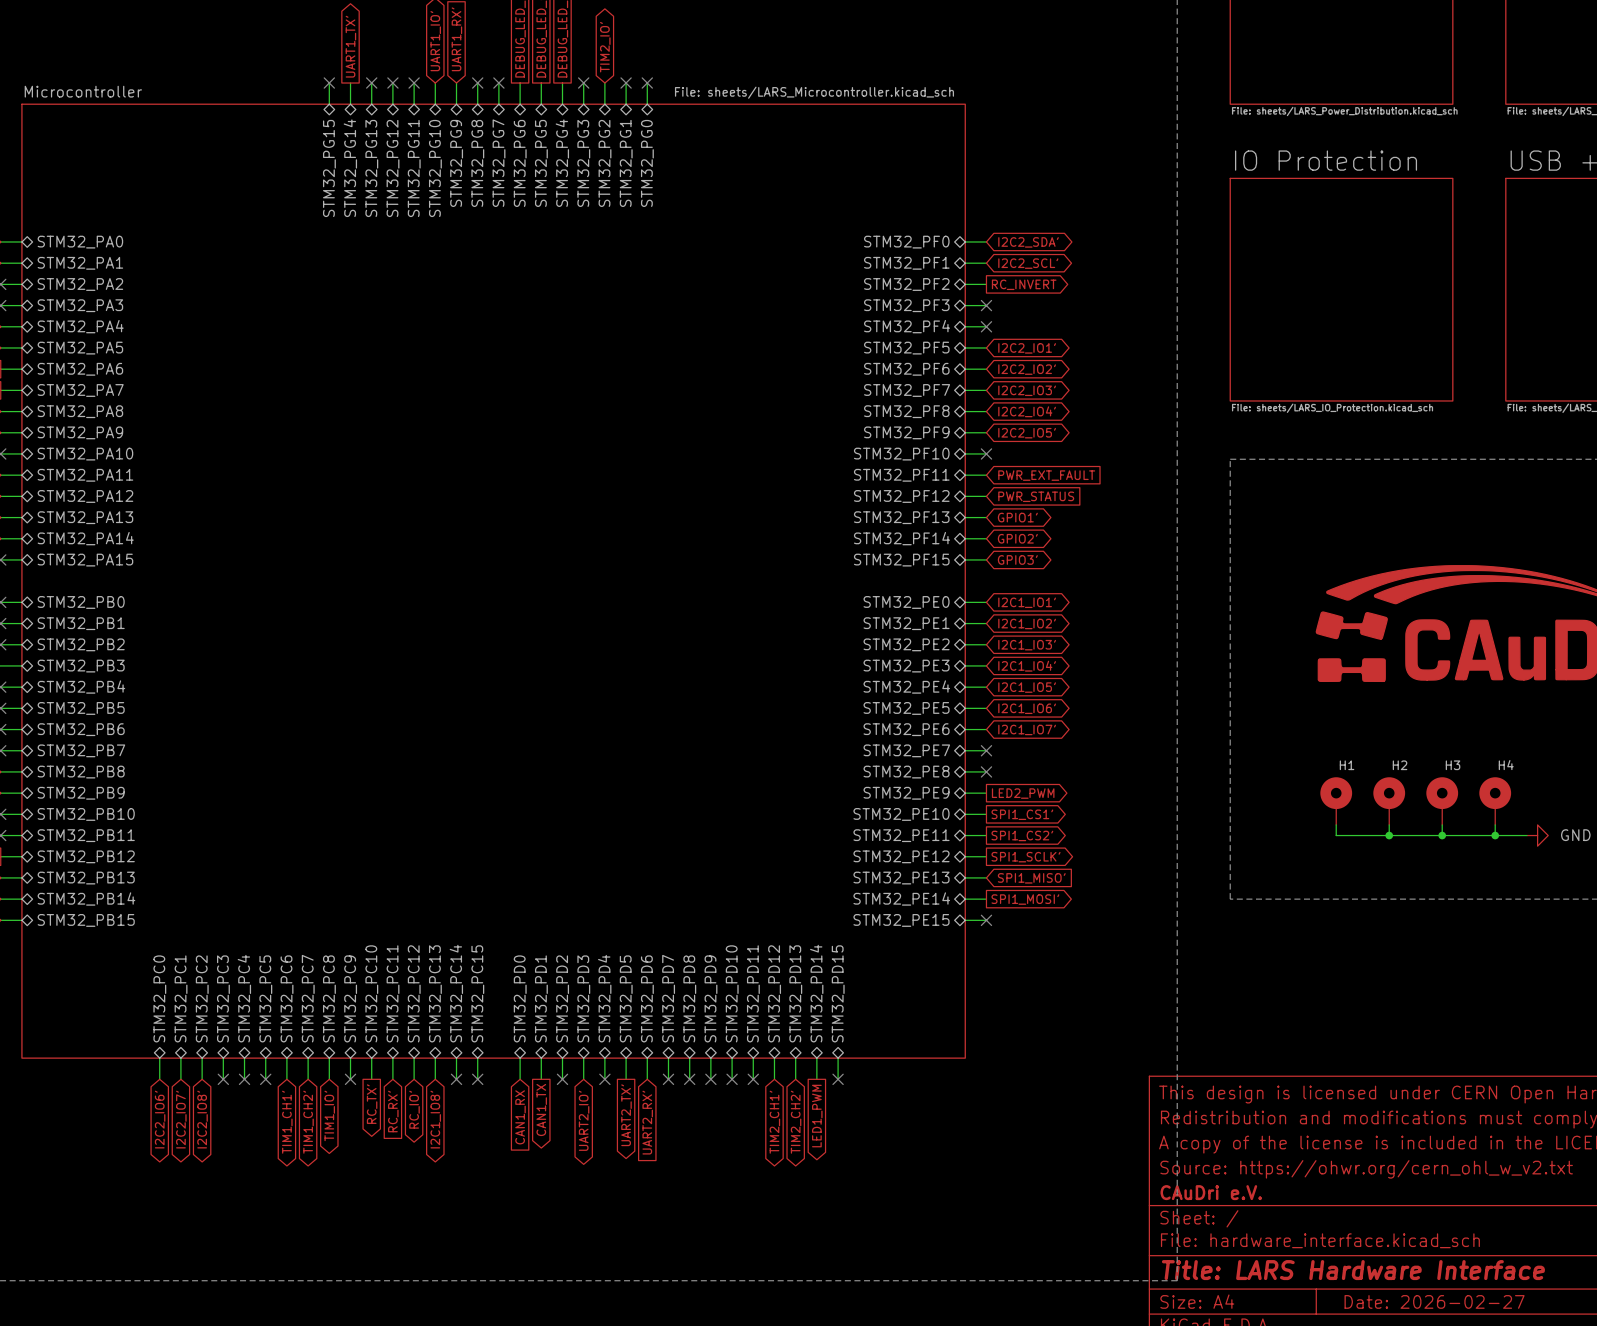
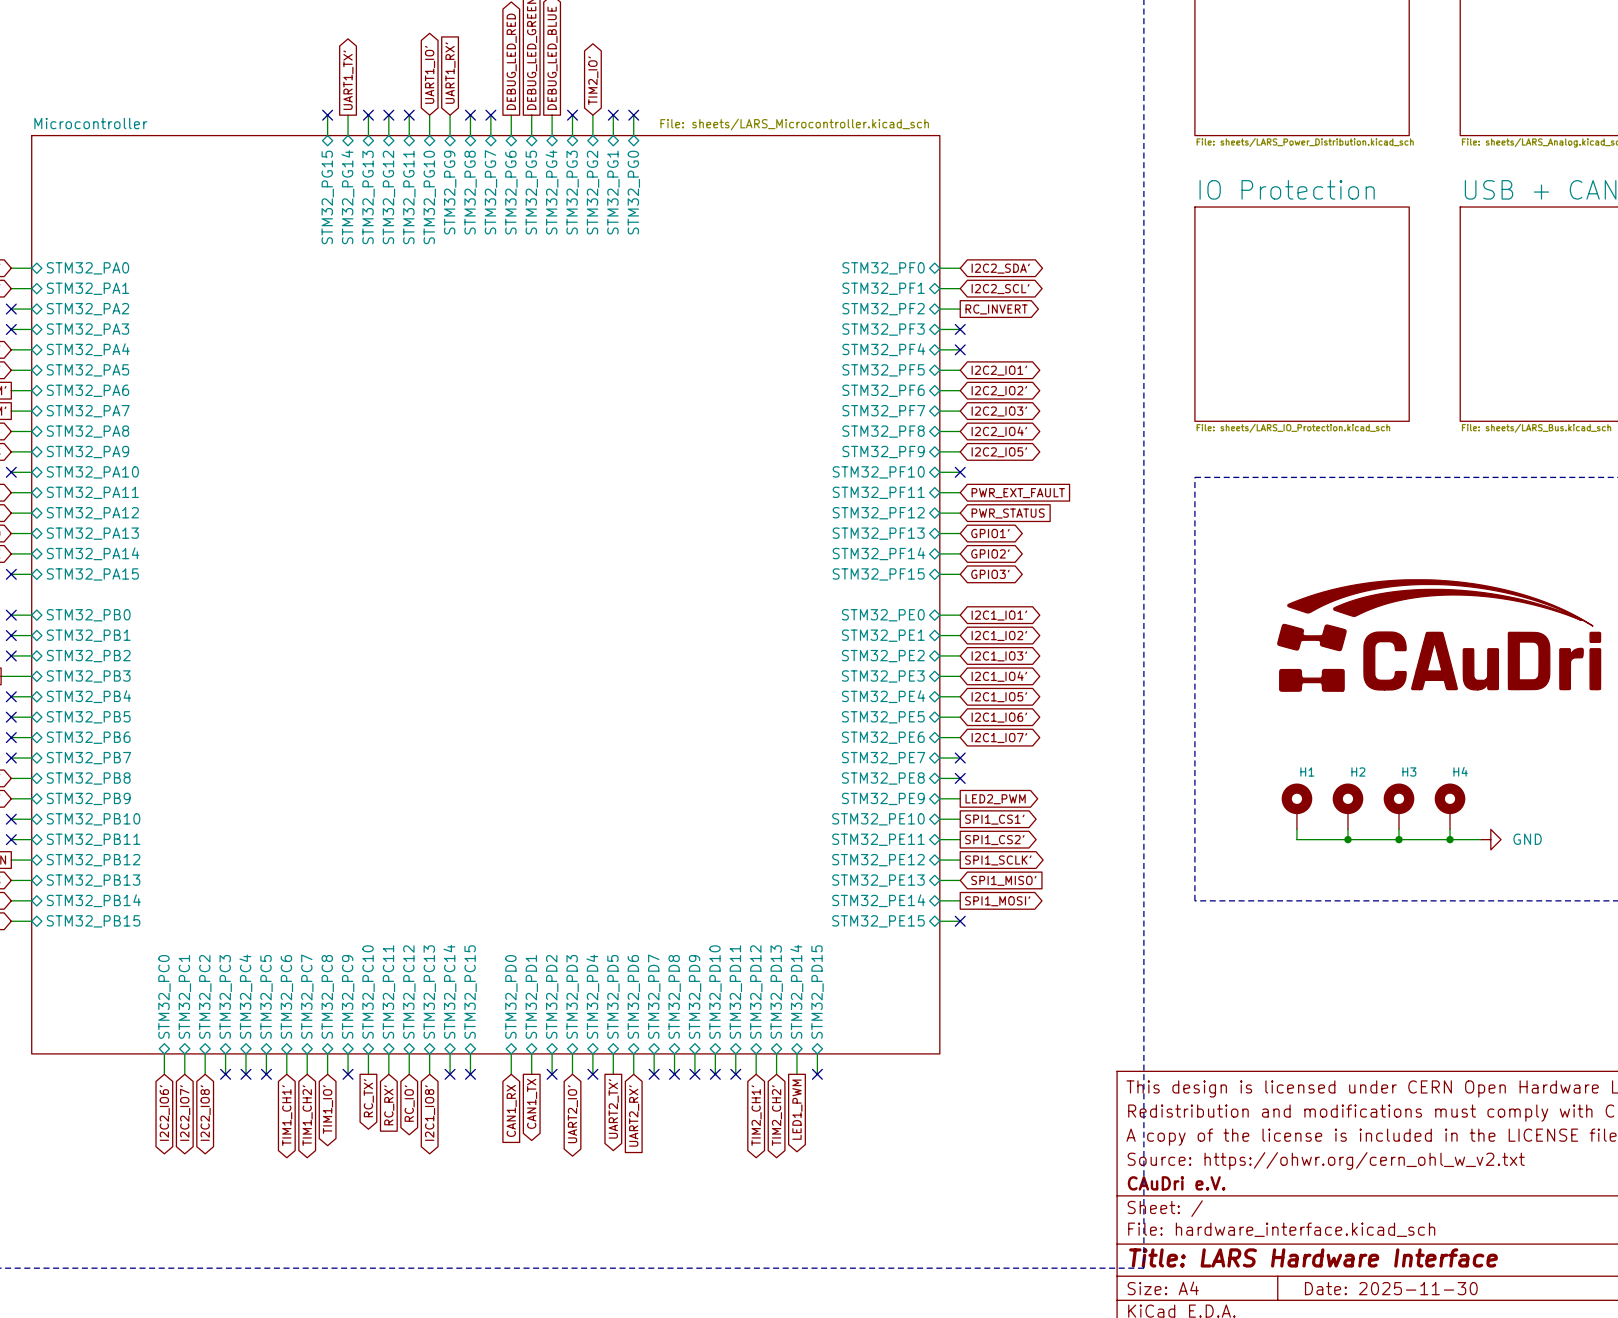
title block: Date: 2026-02-27 (1434, 1301) -> Date: 2025-11-30 (1391, 1288)

